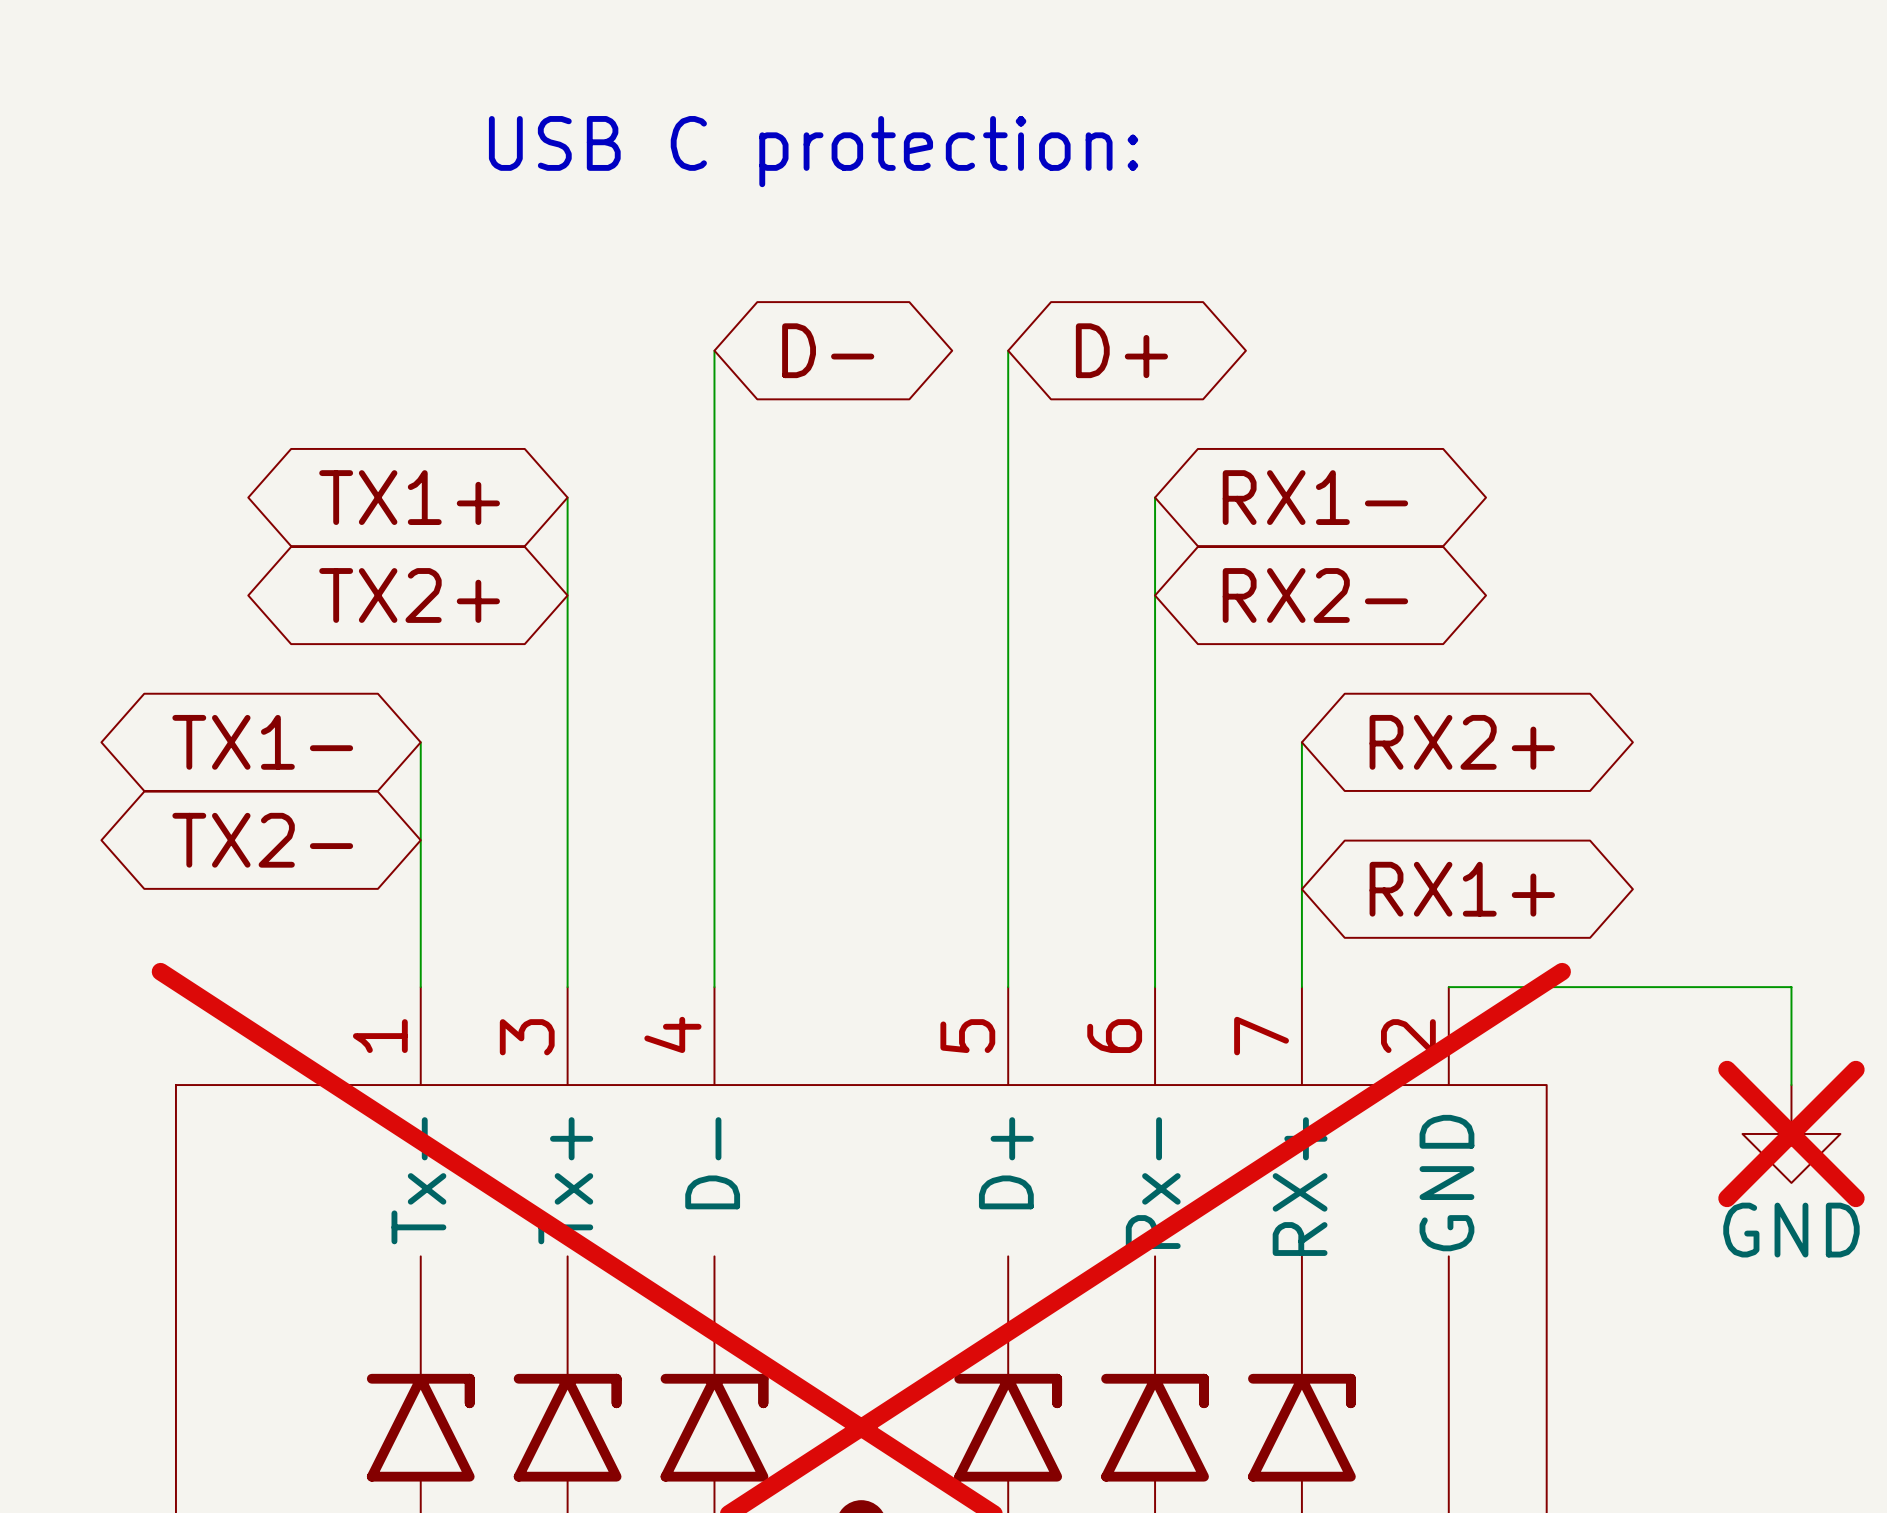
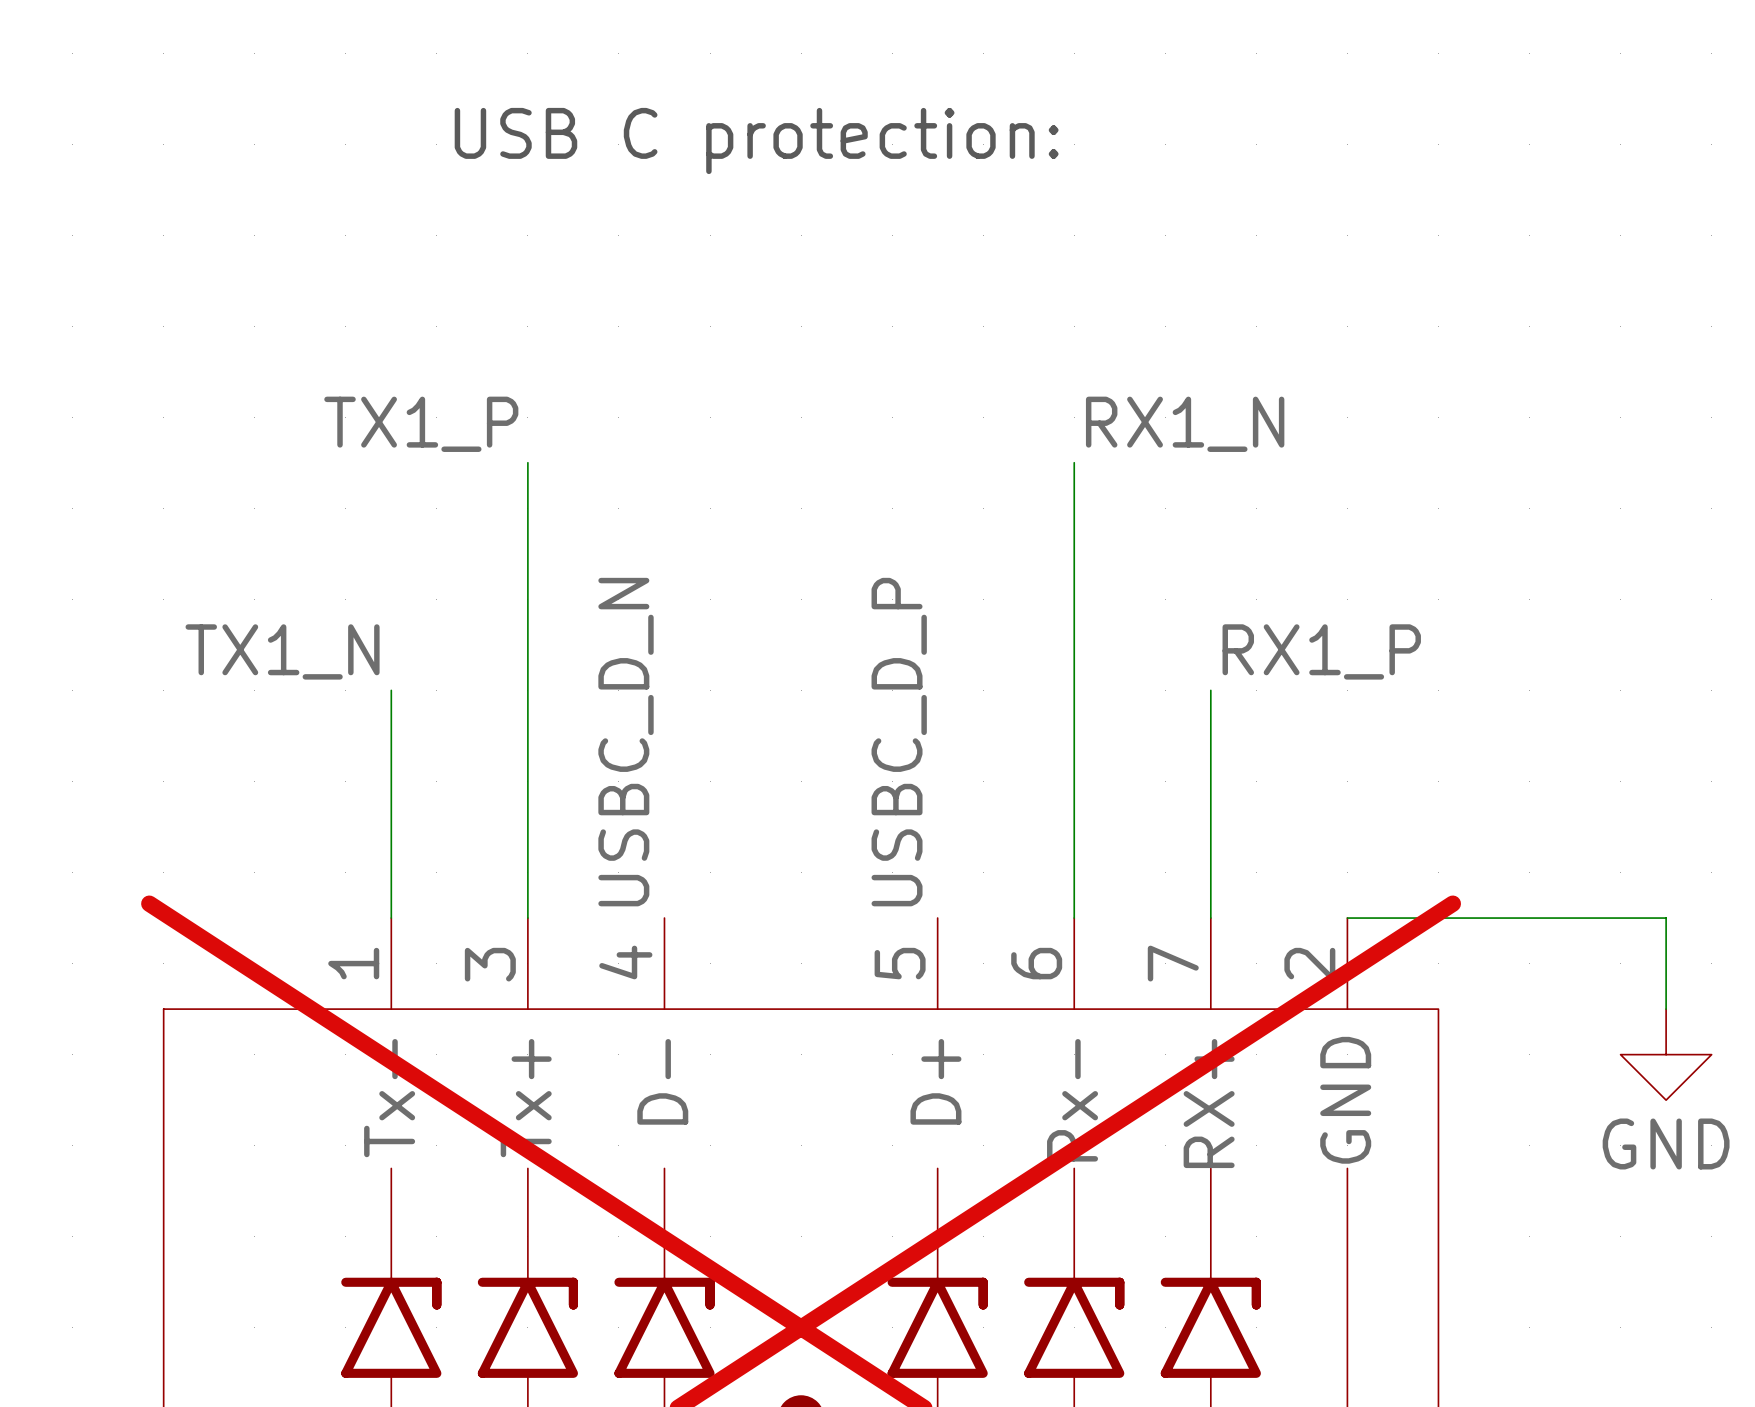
wire: (714, 350) (714, 987) -> none
global label: D- (828, 350) -> none
wire: (1008, 350) (1008, 987) -> none
global label: D+ (1121, 350) -> none
label: none -> TX1_P (421, 424)
label: none -> RX1_N (1185, 424)
global label: TX1+ (409, 497) -> none
global label: RX1- (1315, 497) -> none
global label: TX2+ (409, 595) -> none
global label: RX2- (1315, 595) -> none
label: none -> TX1_N (282, 651)
label: none -> RX1_P (1321, 651)
global label: TX1- (262, 742) -> none
global label: RX2+ (1462, 742) -> none
label: none -> USBC_D_N (626, 742)
label: none -> USBC_D_P (899, 742)
global label: TX2- (262, 840) -> none
global label: RX1+ (1462, 889) -> none
power symbol do-not-place cross: (1791, 1133) -> none

